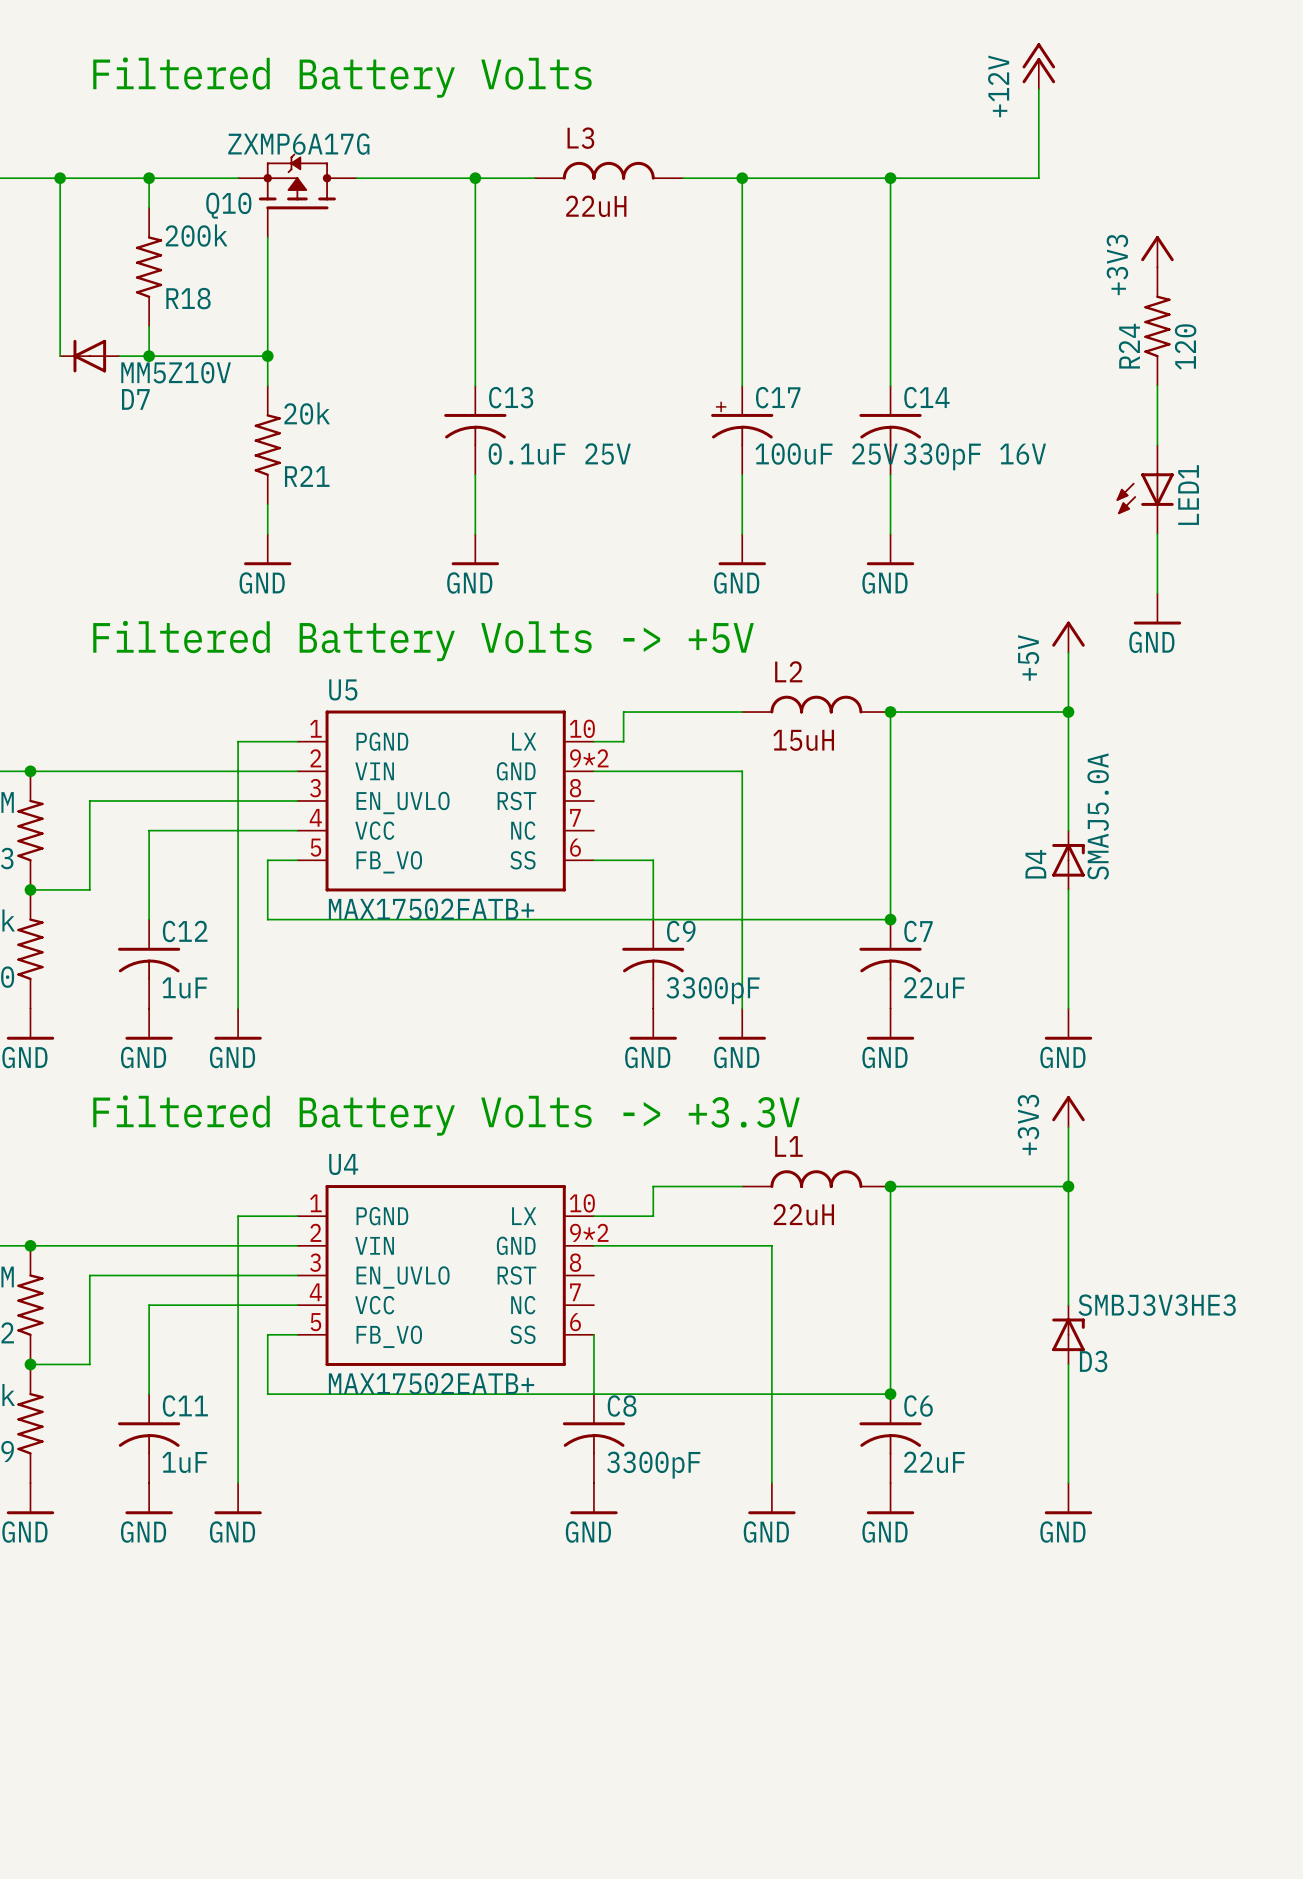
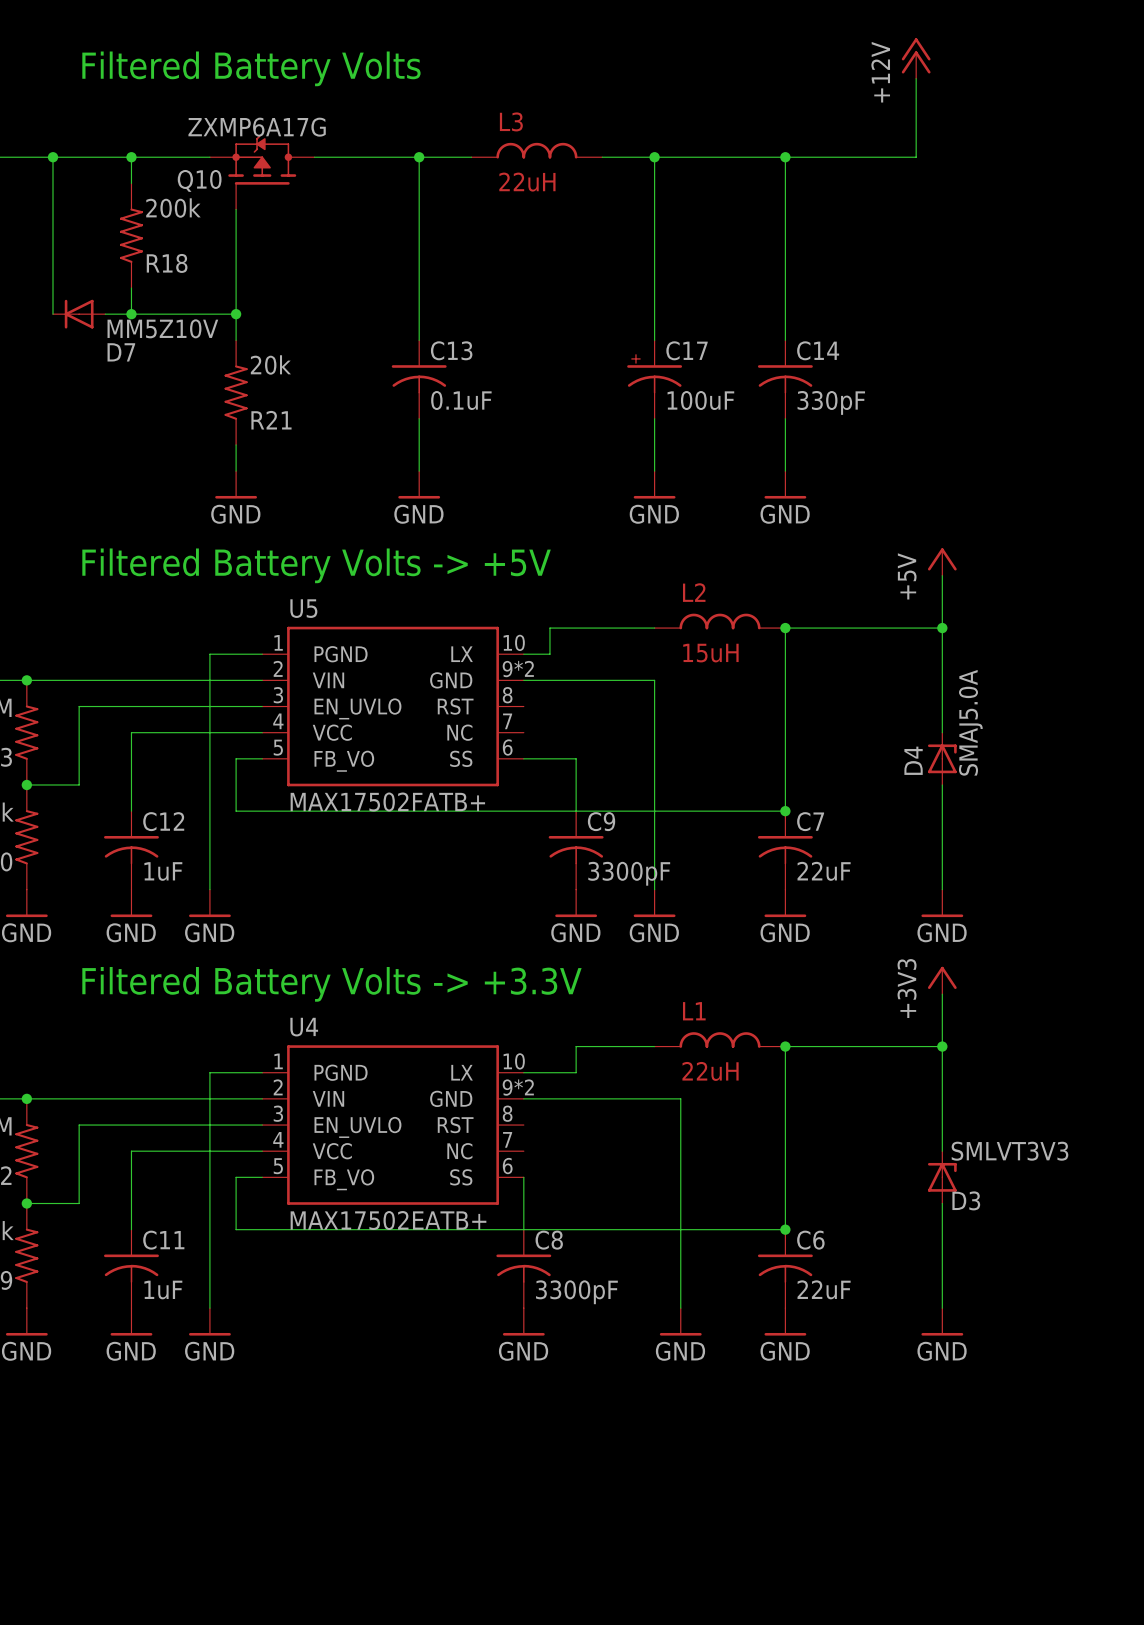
power symbol: +3V3 (1157, 251) -> none
R24: 120 (1157, 326) -> none
wire: (1157, 385) (1157, 445) -> none
C13 value: 0.1uF 25V (559, 454) -> 0.1uF (461, 400)
C17 value: 100uF 25V (826, 454) -> 100uF (700, 400)
C14 value: 330pF 16V (974, 456) -> 330pF (831, 402)
LED1: (1145, 489) -> none
wire: (1157, 534) (1157, 593) -> none
power symbol: GND (1157, 608) -> none
D3 value: SMBJ3V3HE3 (1157, 1305) -> SMLVT3V3 (1009, 1151)

